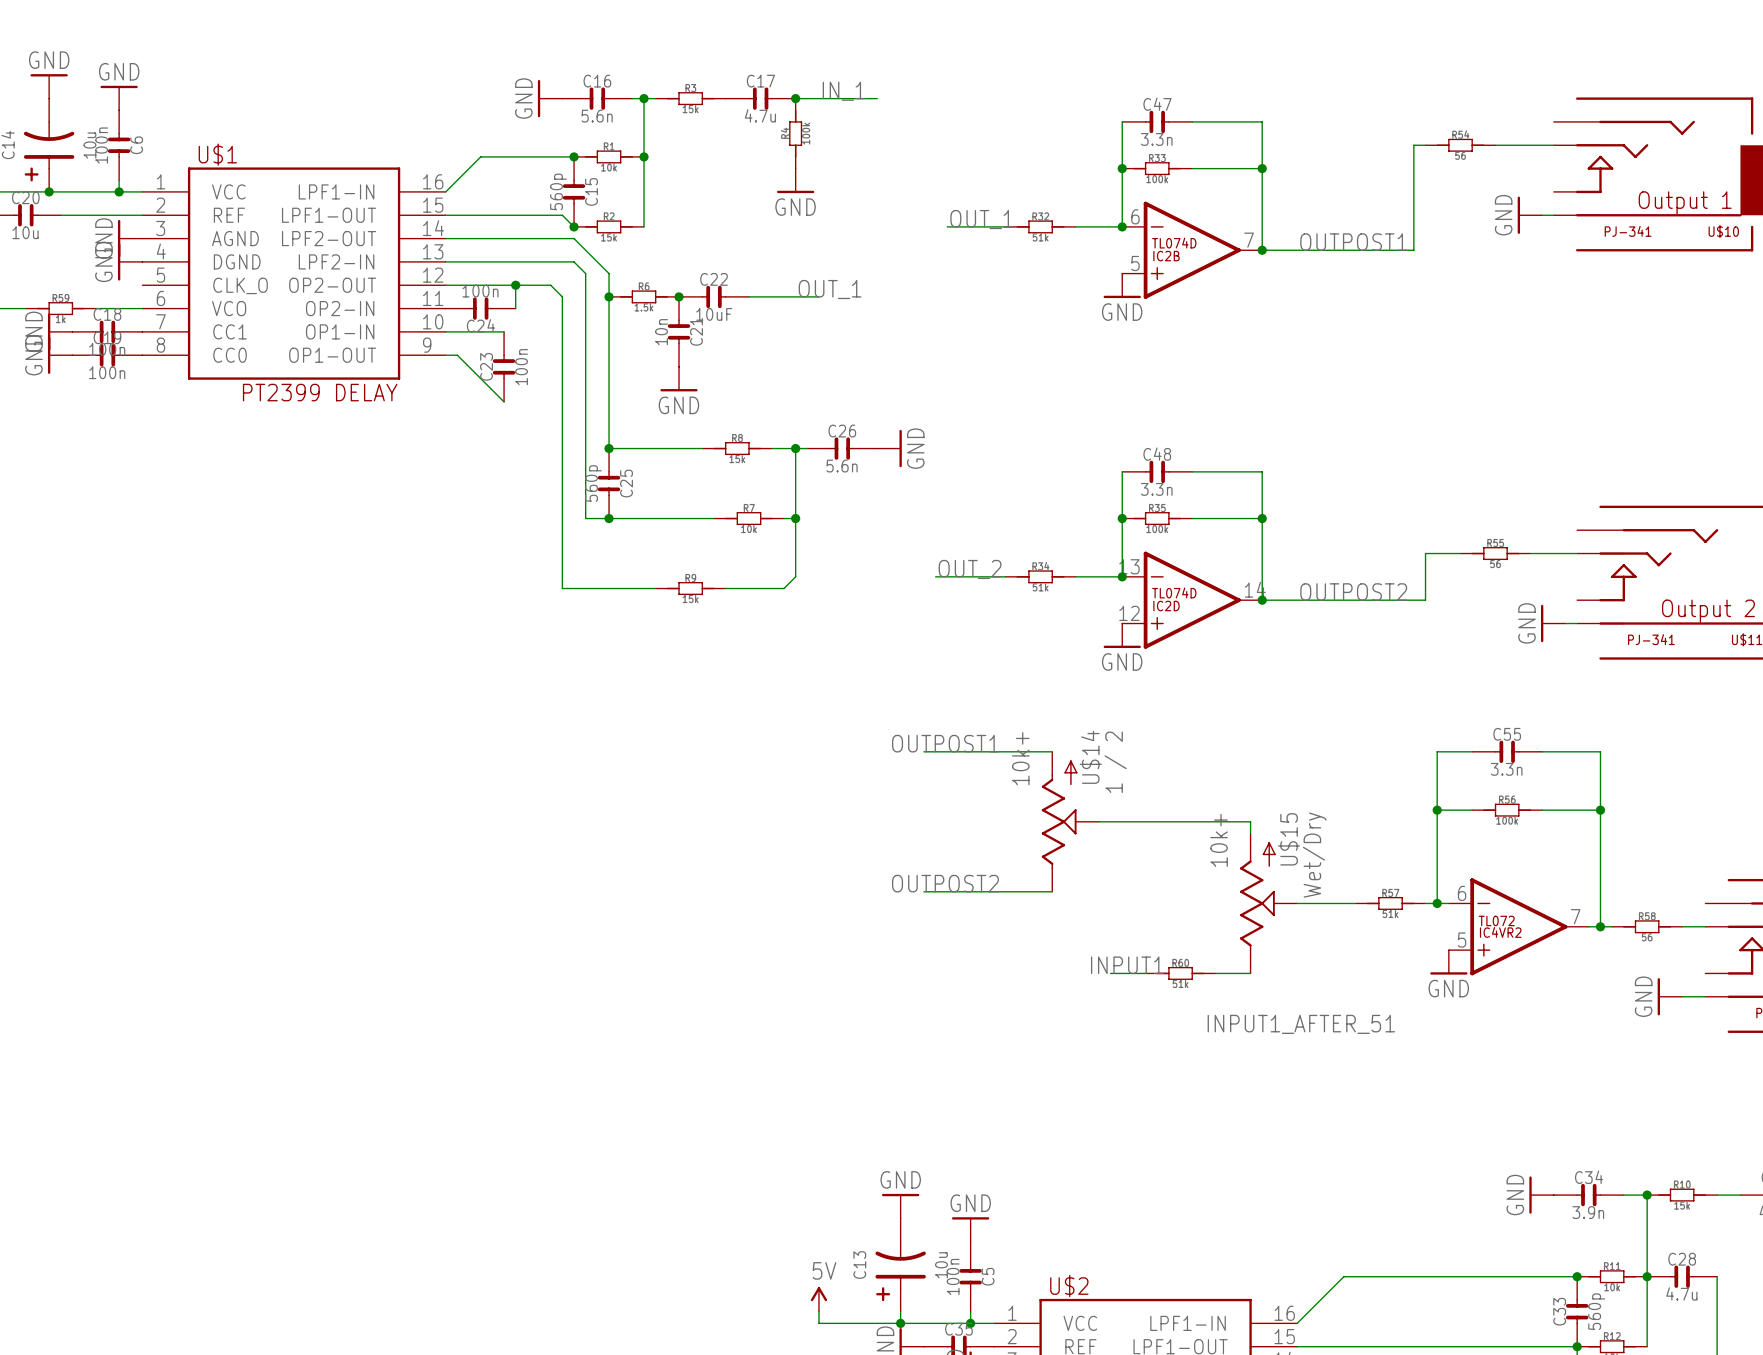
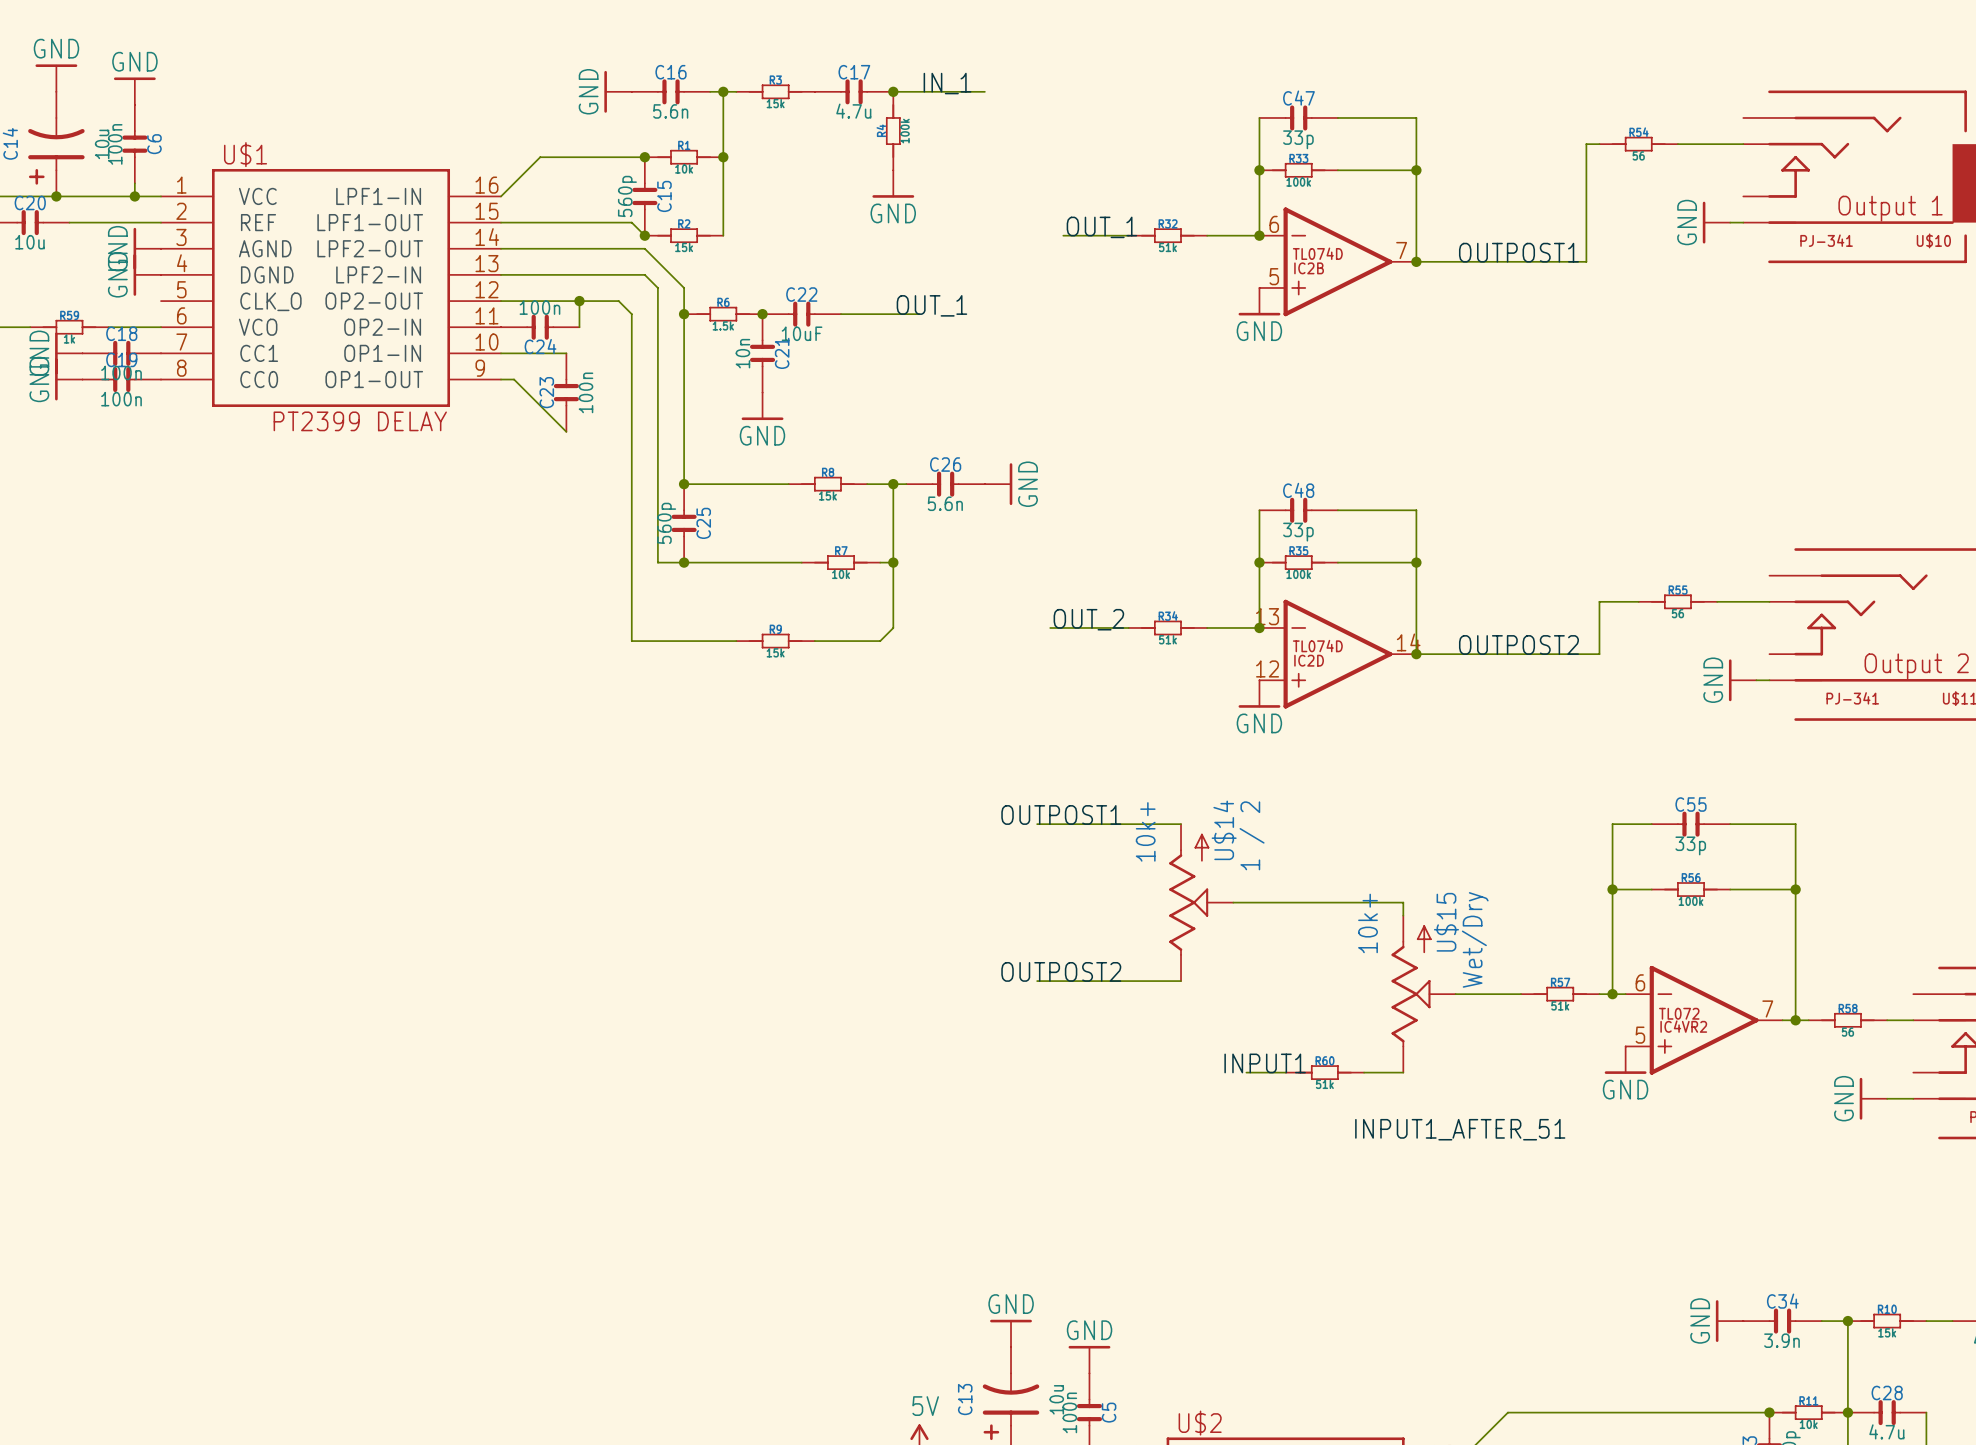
C47 value: 3.3n (1156, 139) -> 33p (1298, 139)
C48 value: 3.3n (1156, 489) -> 33p (1298, 532)
C55 value: 3.3n (1506, 769) -> 33p (1690, 845)

